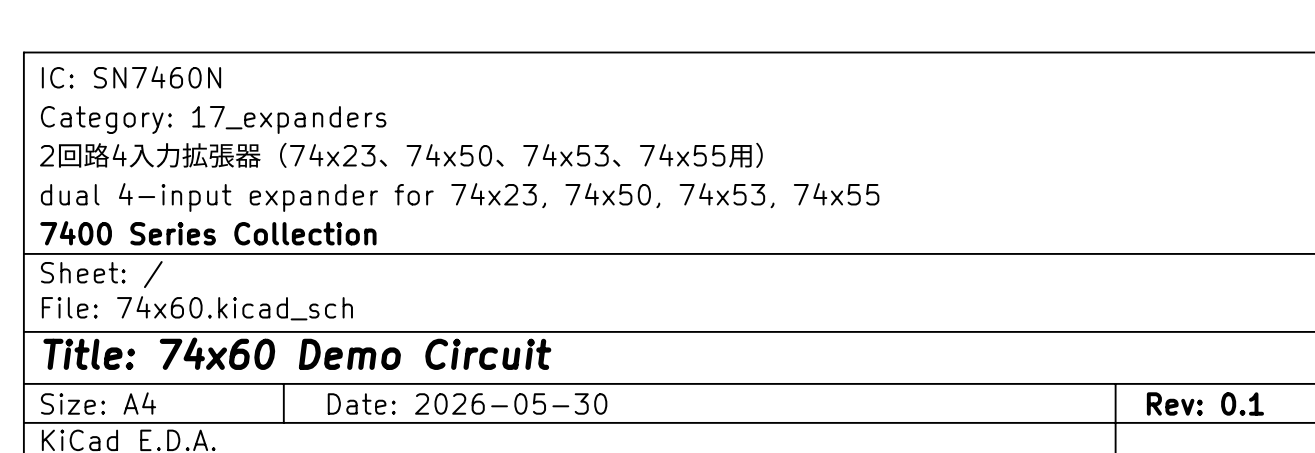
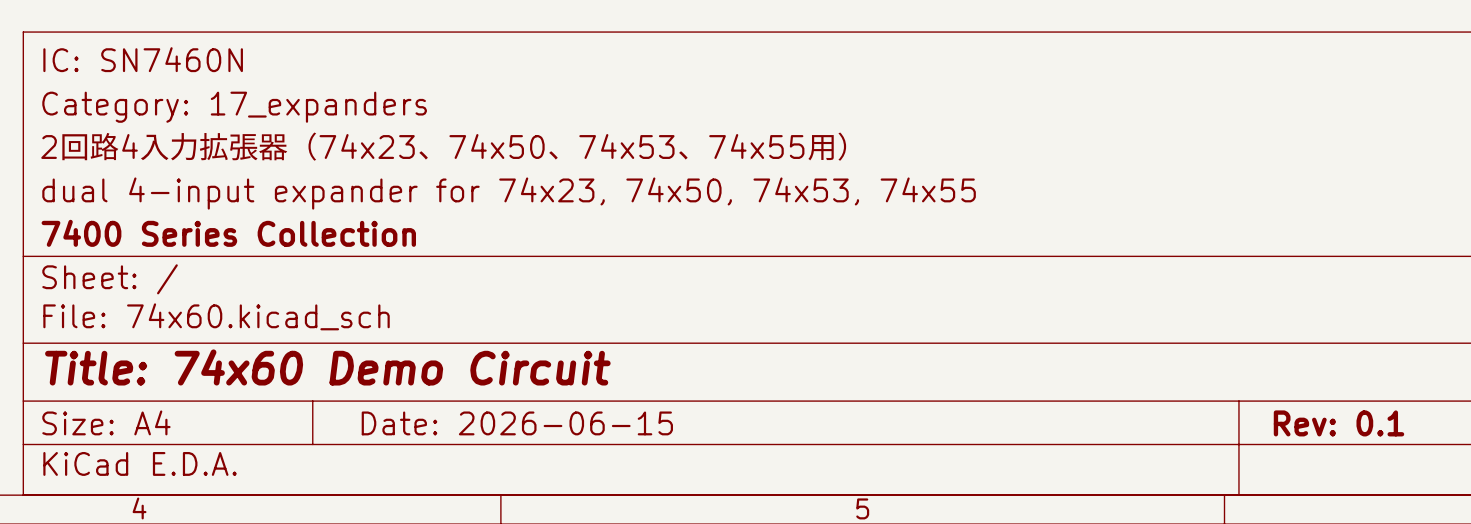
title block: Date: 2026-05-30 (467, 403) -> Date: 2026-06-15 (517, 423)

